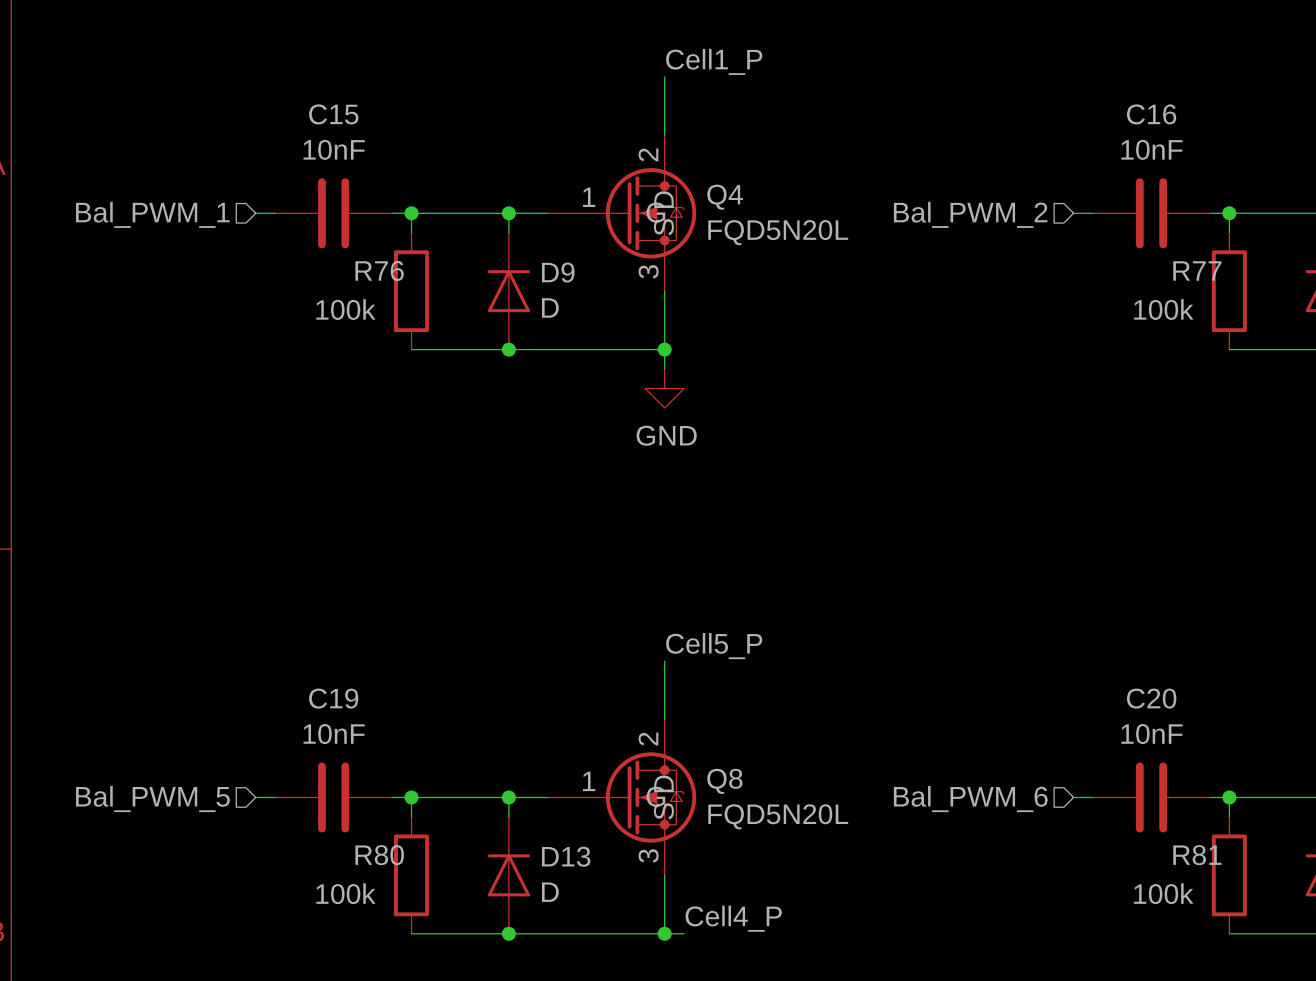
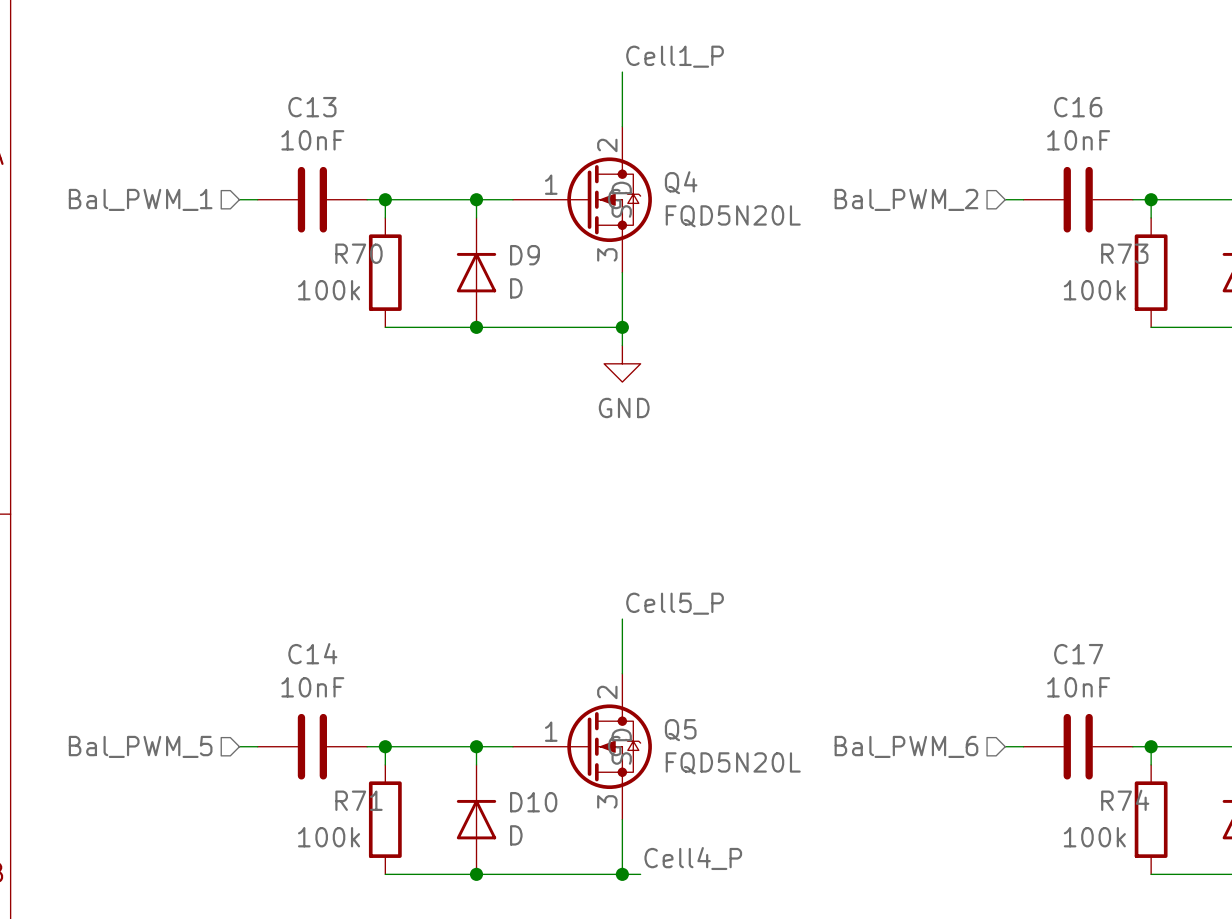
C15 name: C15 (333, 114) -> C13 (312, 107)
R76 name: R76 (379, 270) -> R70 (358, 253)
R77 name: R77 (1197, 270) -> R73 (1124, 253)
C19 name: C19 (333, 698) -> C14 (312, 653)
C20 name: C20 (1151, 698) -> C17 (1078, 654)
Q8 name: Q8 (724, 781) -> Q5 (680, 730)
R80 name: R80 (379, 855) -> R71 (358, 800)
R81 name: R81 (1197, 855) -> R74 (1125, 800)
D13 name: D13 (566, 856) -> D10 (533, 802)

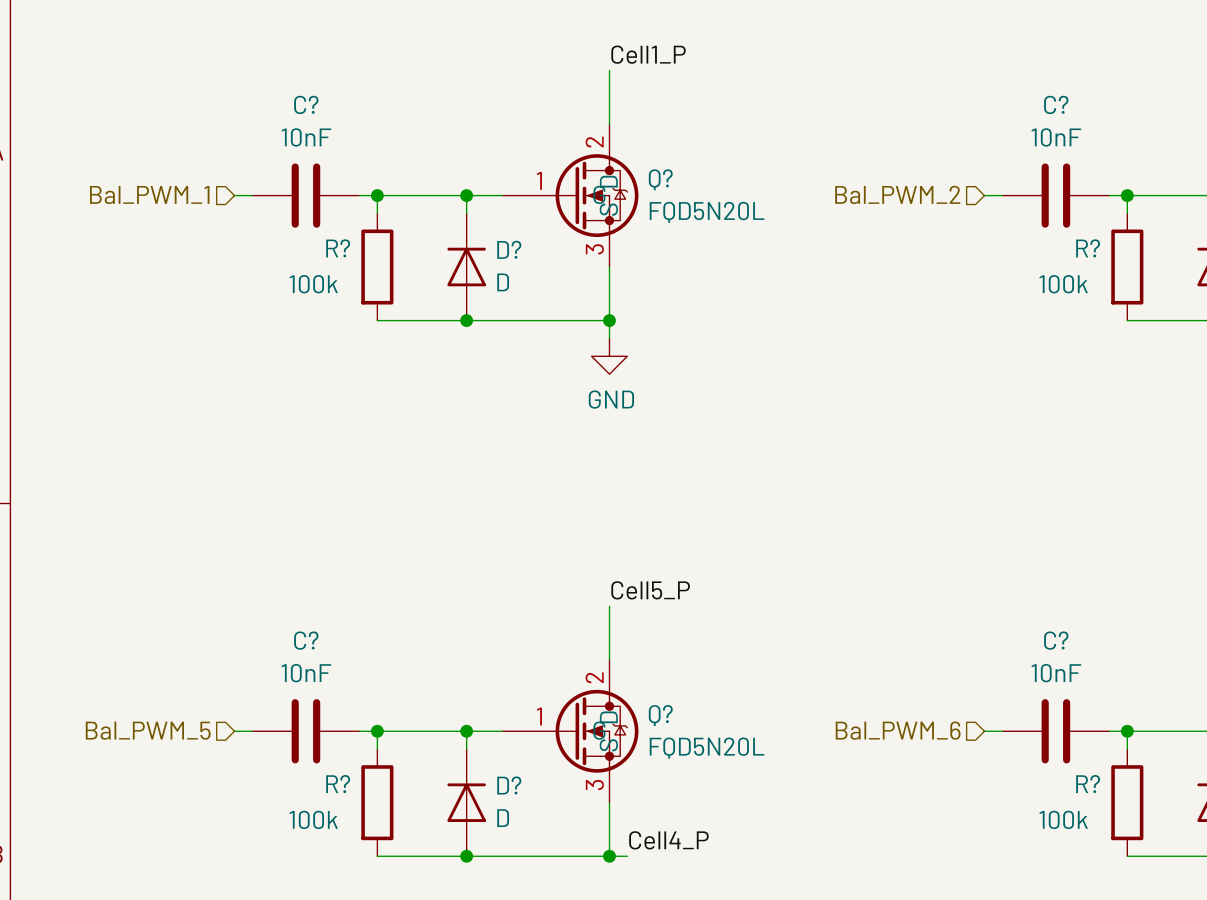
C13 name: C13 (312, 107) -> C? (306, 104)
C16 name: C16 (1078, 107) -> C? (1056, 104)
Q4 name: Q4 (681, 182) -> Q? (660, 179)
R70 name: R70 (358, 253) -> R? (338, 248)
R73 name: R73 (1124, 253) -> R? (1088, 248)
D9 name: D9 (524, 255) -> D? (509, 249)
C14 name: C14 (312, 653) -> C? (306, 640)
C17 name: C17 (1078, 654) -> C? (1056, 640)
Q5 name: Q5 (680, 730) -> Q? (660, 715)
R71 name: R71 (358, 800) -> R? (338, 784)
R74 name: R74 (1125, 800) -> R? (1088, 784)
D10 name: D10 (533, 802) -> D? (509, 785)

